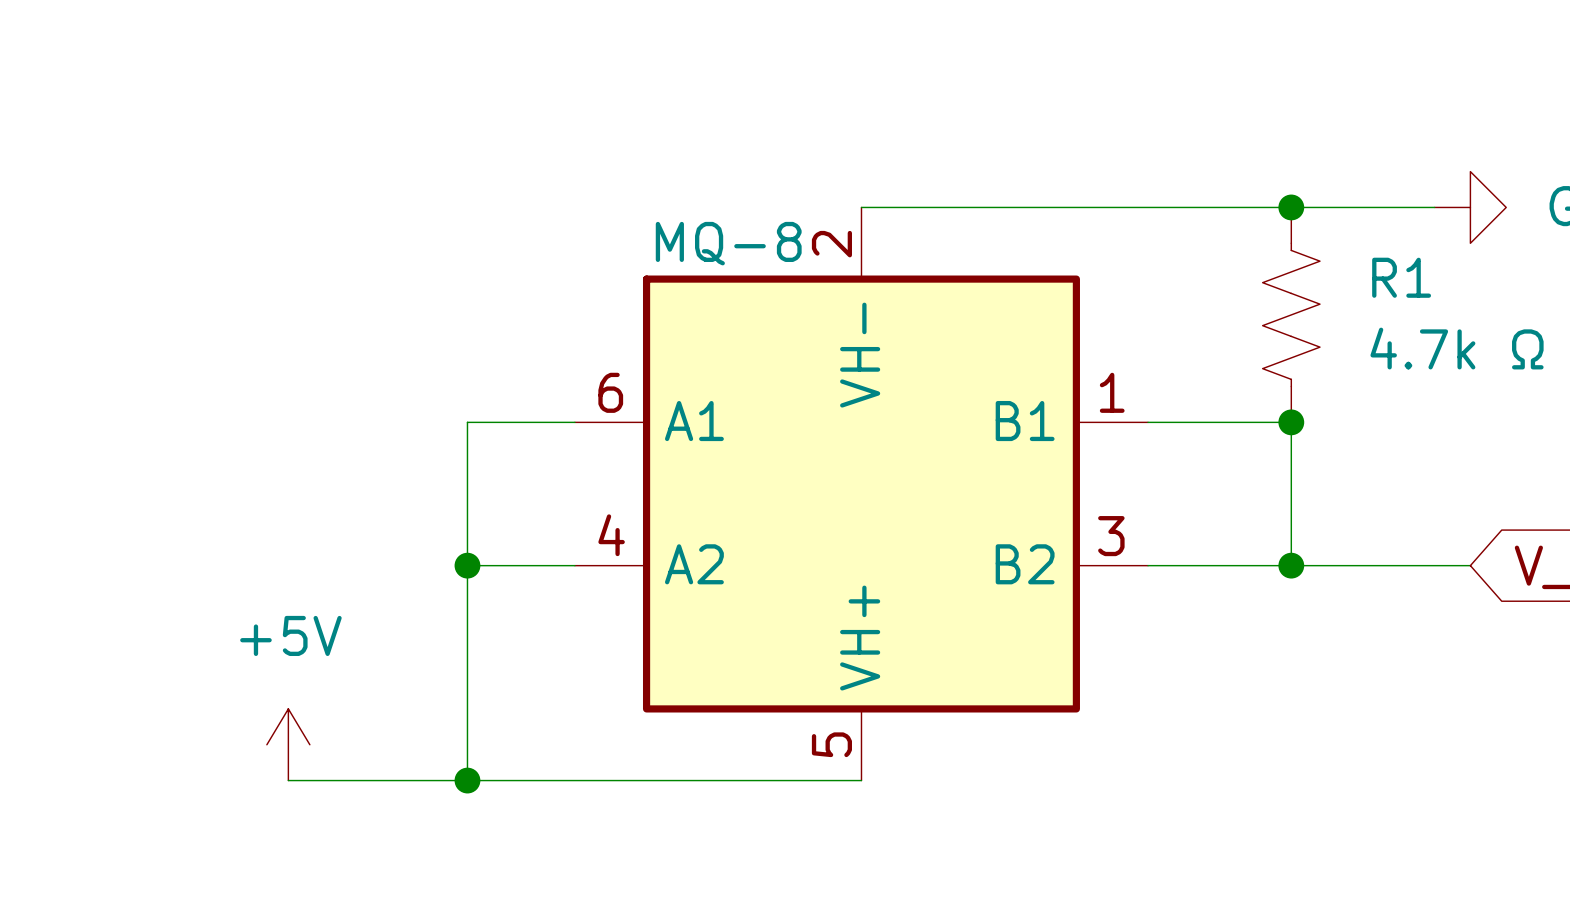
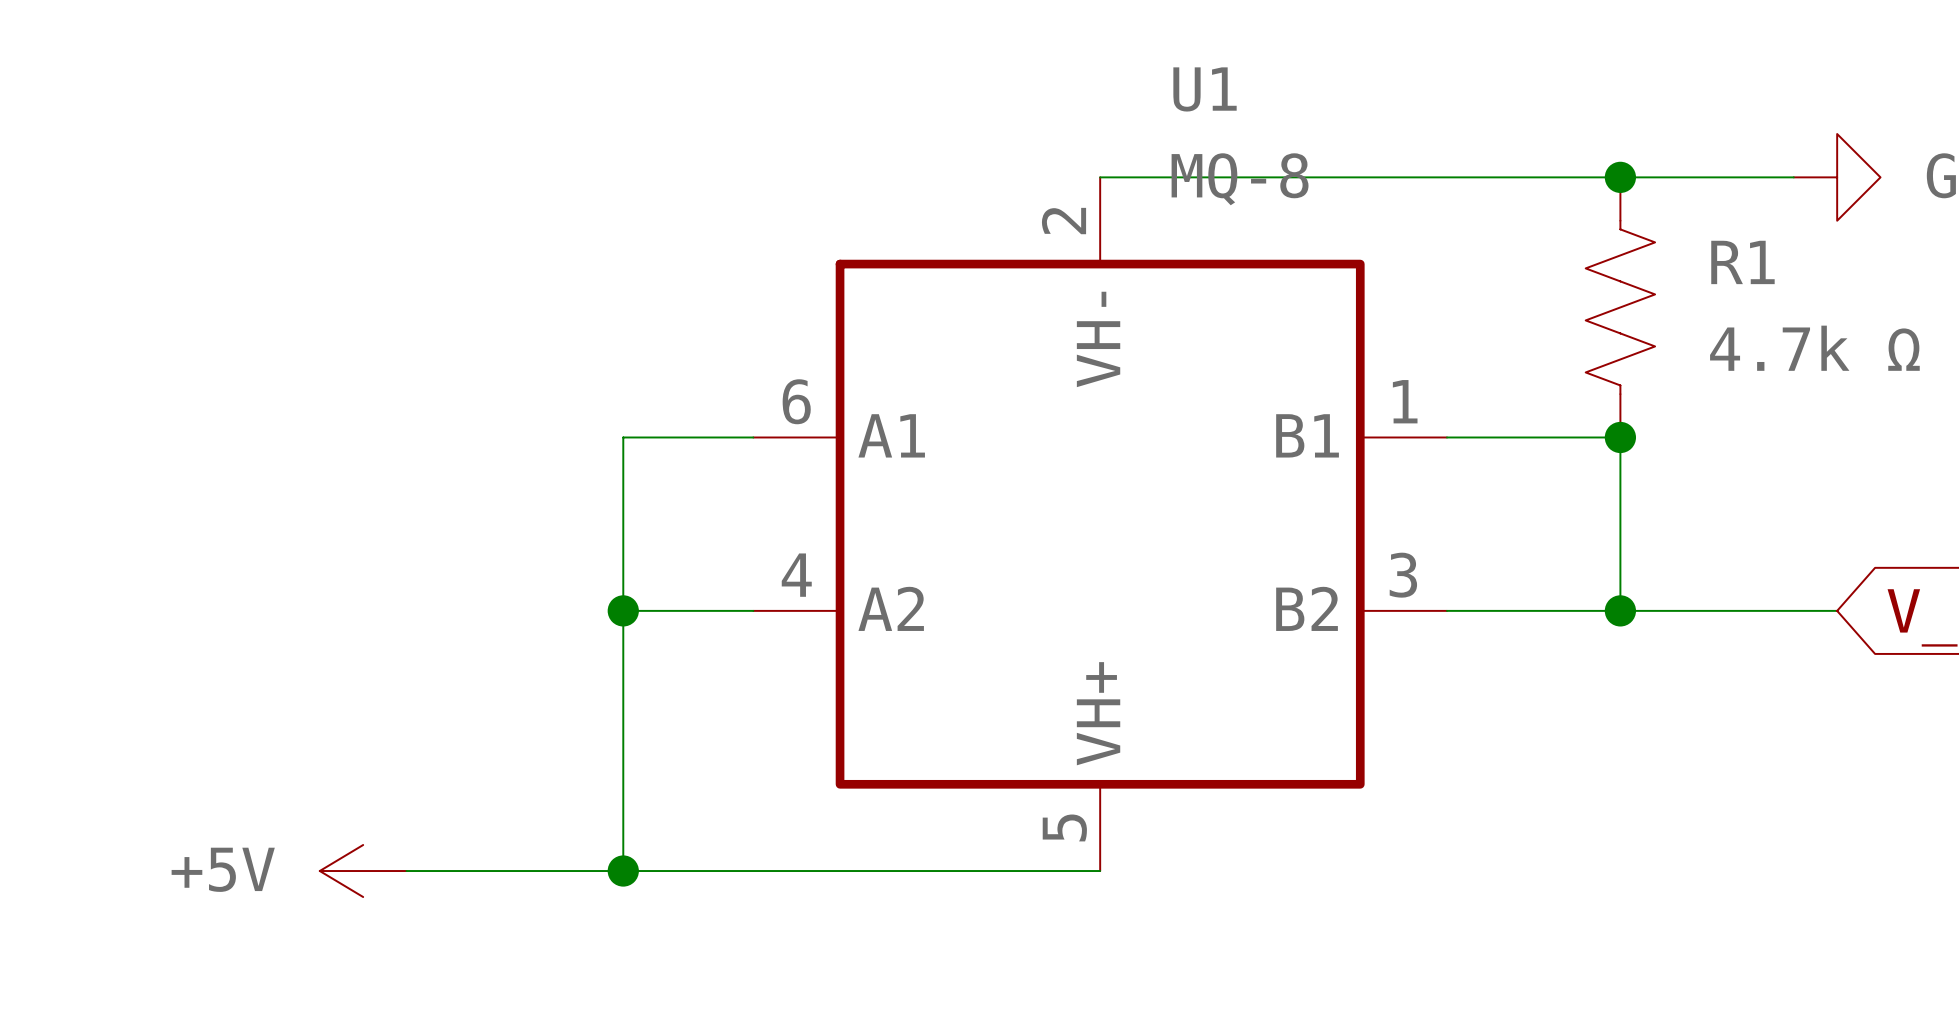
MQ-8 value: none -> MQ-8 (1240, 179)
MQ-8 name: MQ-8 (728, 243) -> U1 (1205, 89)
power symbol rotation: 0° (288, 744) -> 90° counterclockwise (363, 871)
power symbol position: +5V (288, 744) -> +5V (363, 871)

